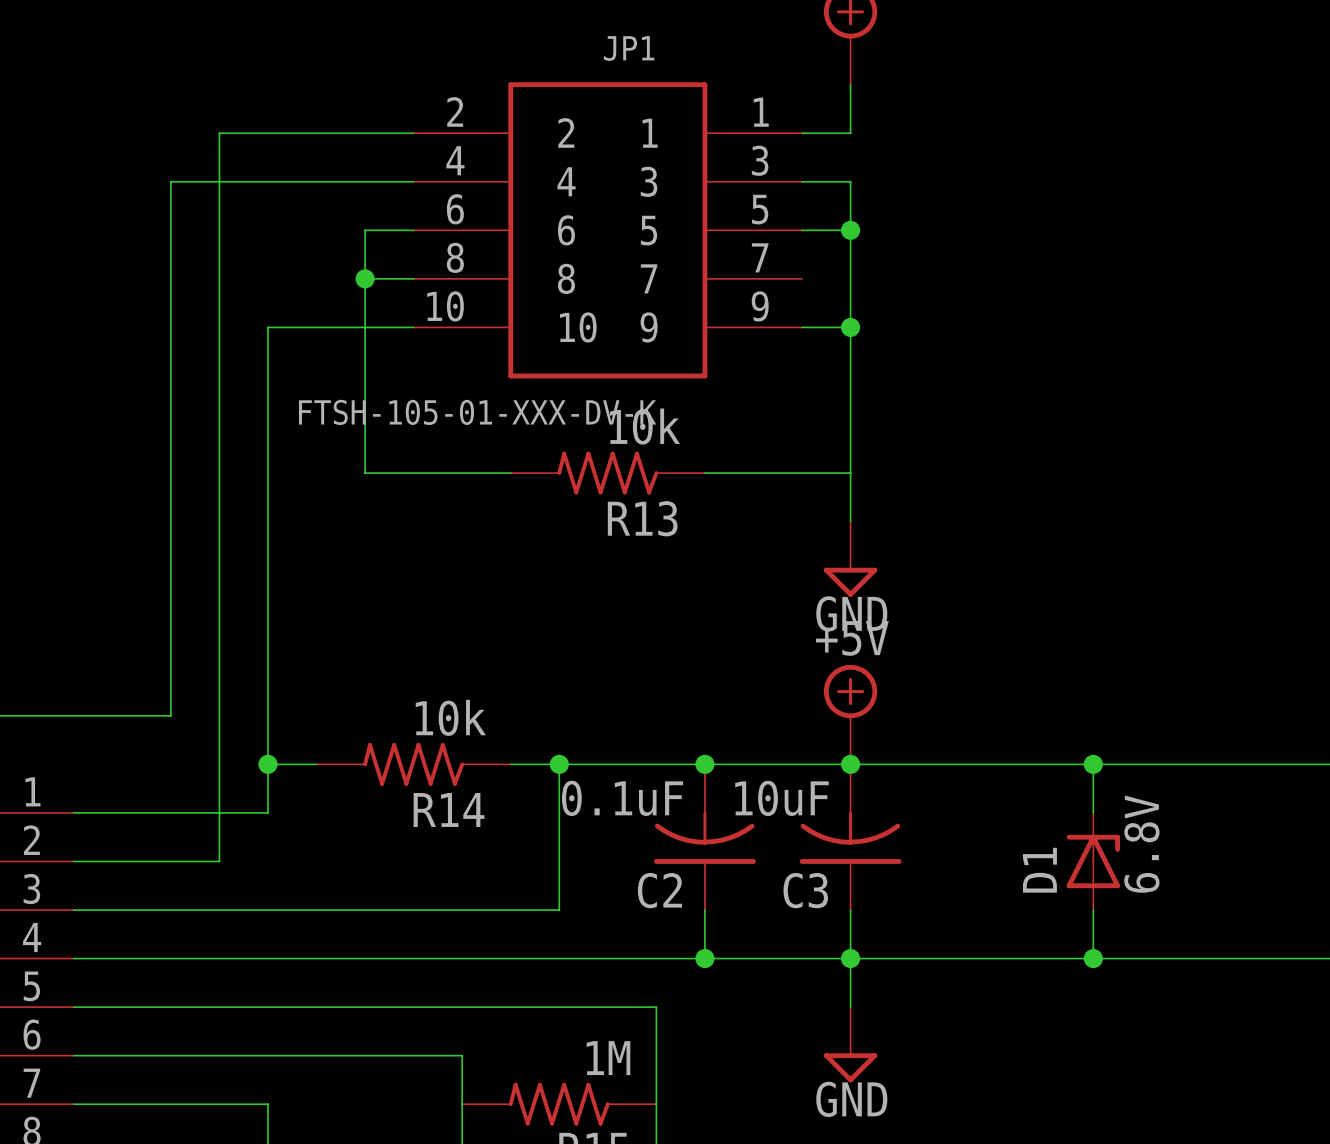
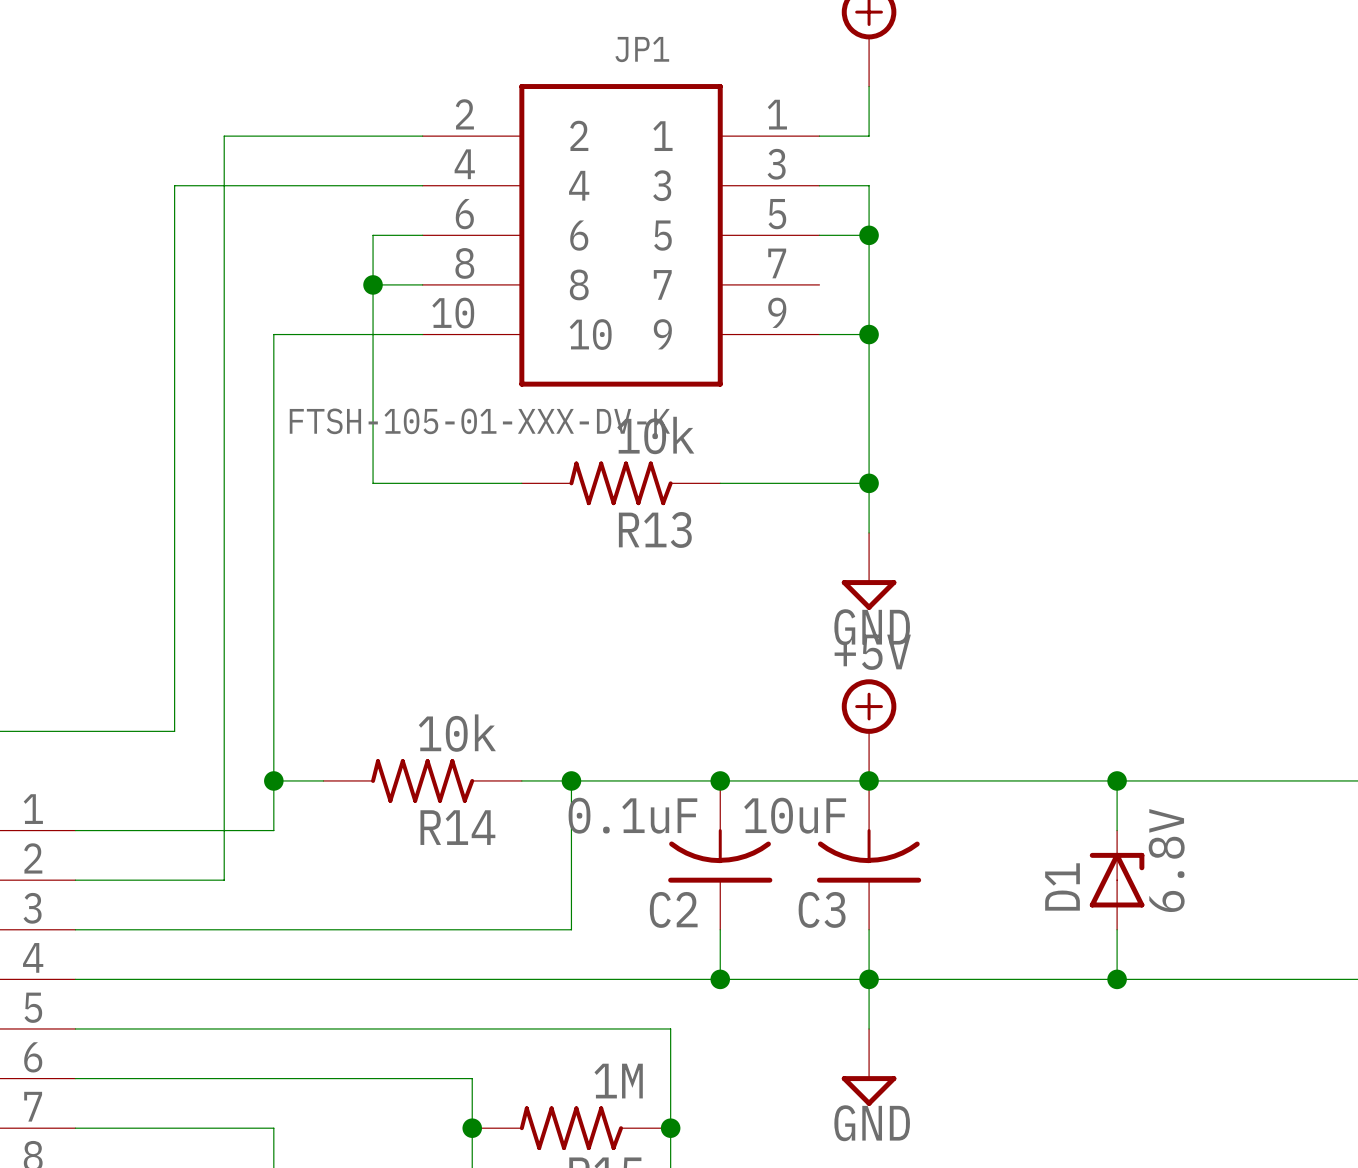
junction: none -> (869, 483)
junction: none -> (472, 1128)
junction: none -> (670, 1128)

